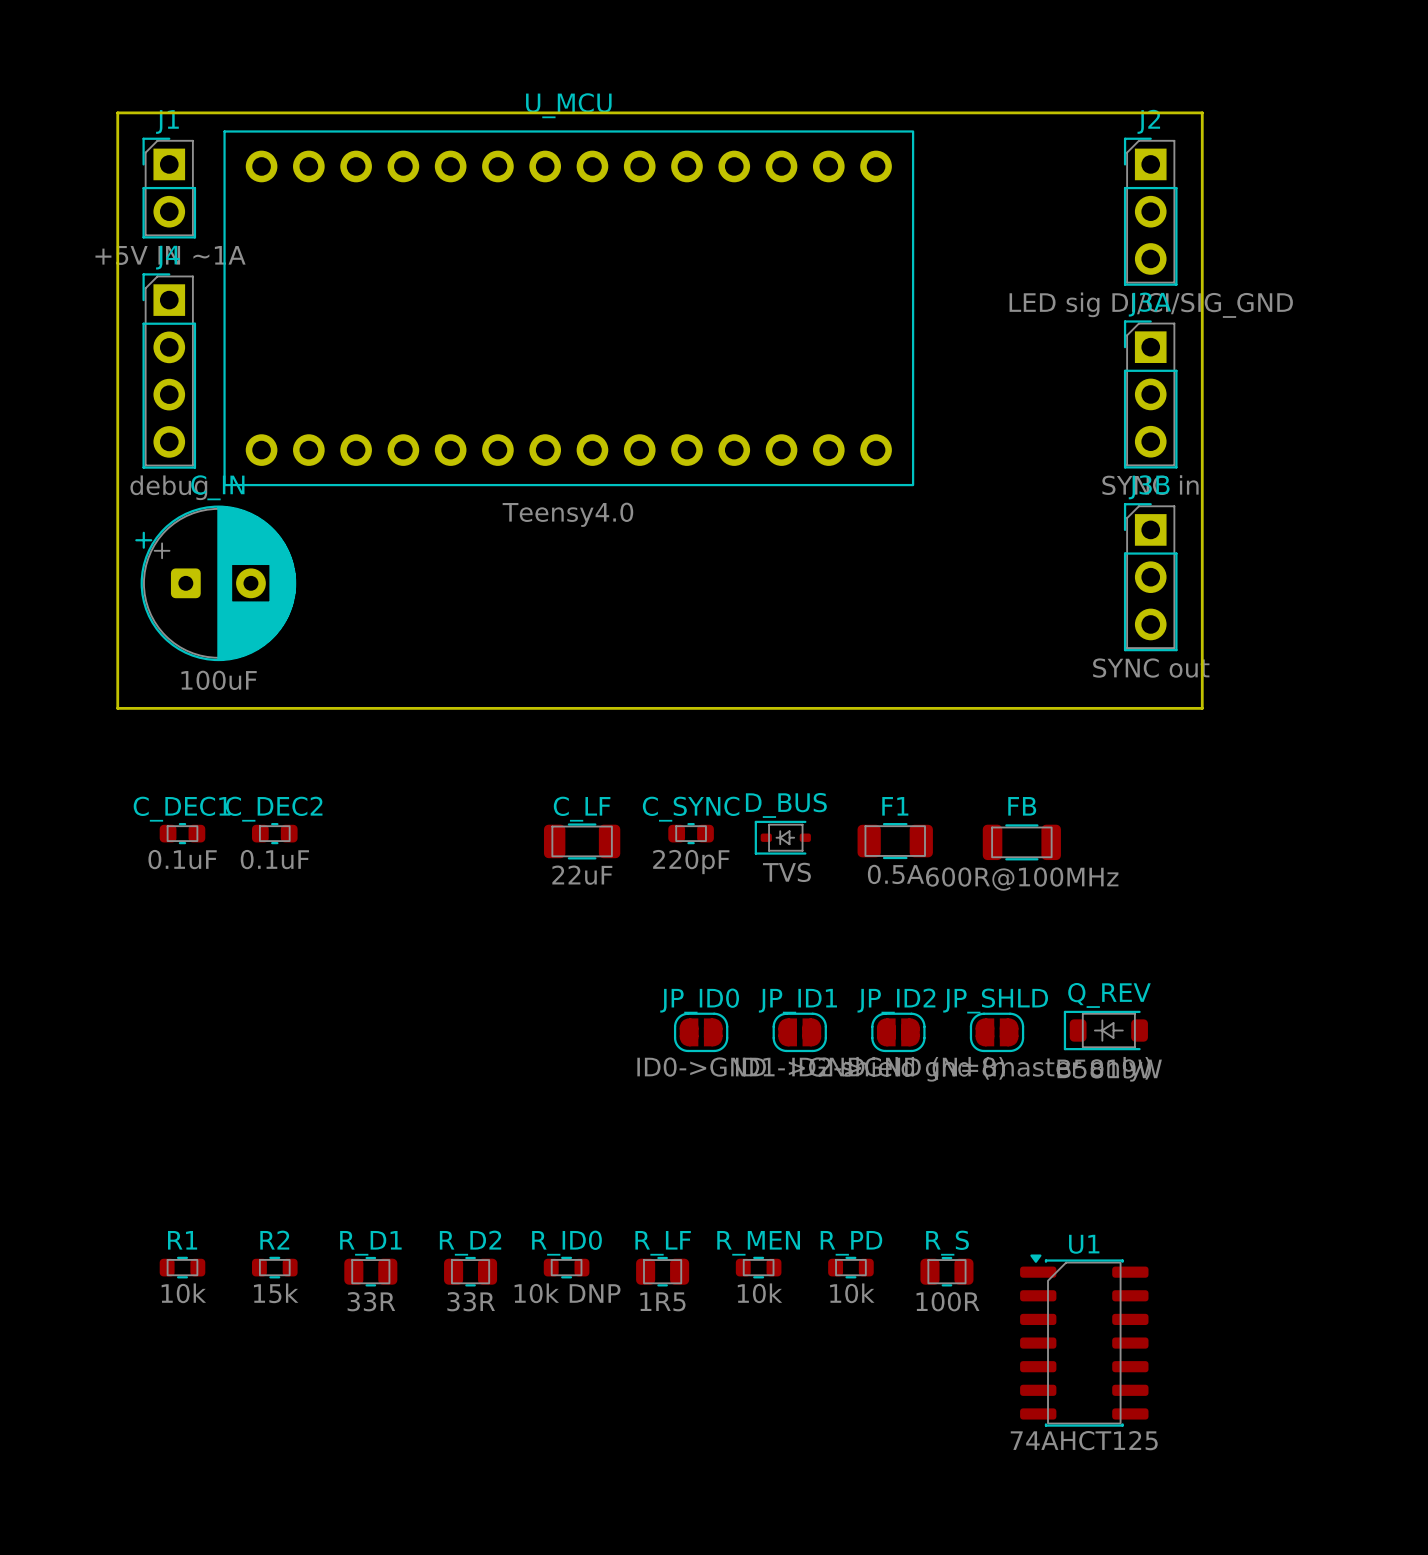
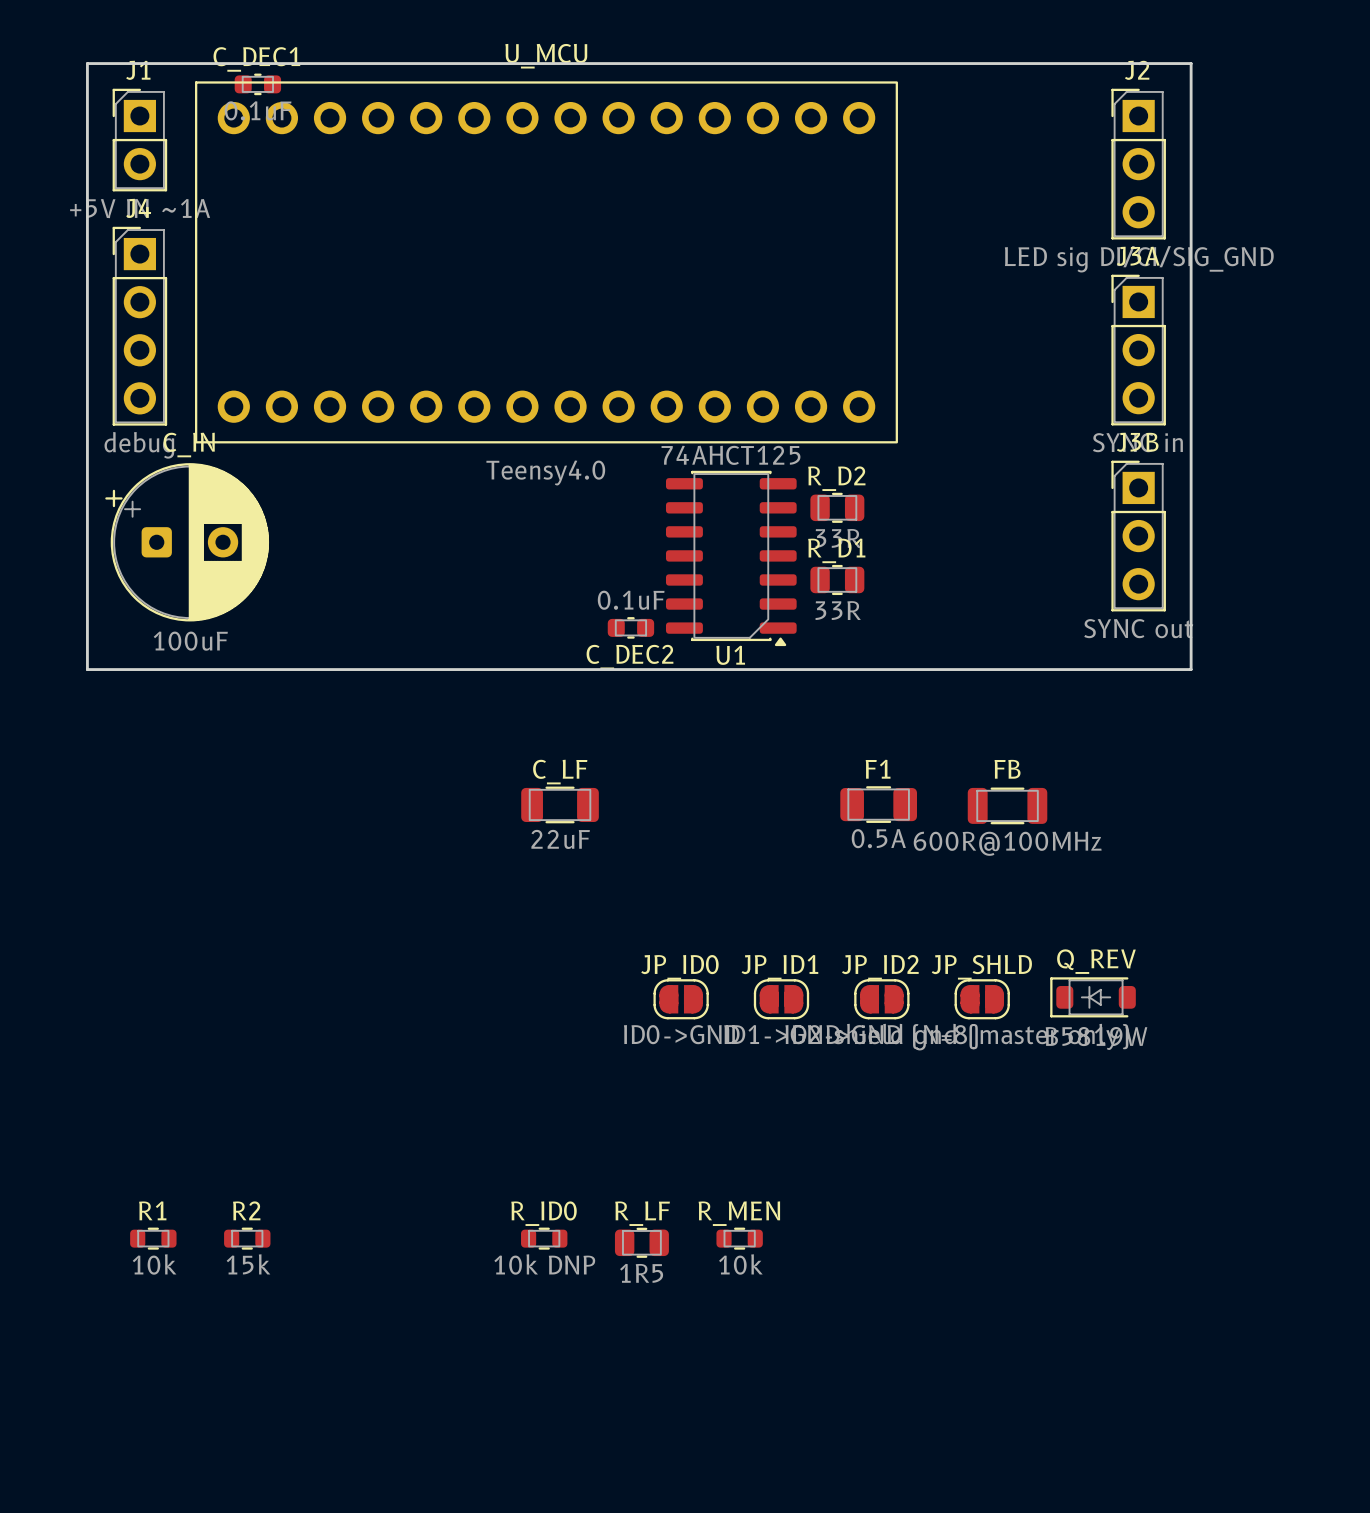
C_DEC2 name position: C_DEC2 (274, 809) -> C_DEC2 (629, 657)
C_DEC1 position: (182, 833) -> (257, 84)
C_DEC2 position: (274, 833) -> (630, 627)
C_SYNC: 220pF (691, 833) -> none
D_BUS: TVS (782, 837) -> none
C_DEC2 value position: 0.1uF (274, 859) -> 0.1uF (631, 600)
R_PD: 10k (850, 1267) -> none
R_D1 position: (370, 1271) -> (837, 579)
R_D2 position: (470, 1271) -> (837, 507)
R_S: 100R (946, 1271) -> none
U1 rotation: 0° (1084, 1340) -> 180° (731, 558)
U1 position: (1084, 1340) -> (731, 558)

